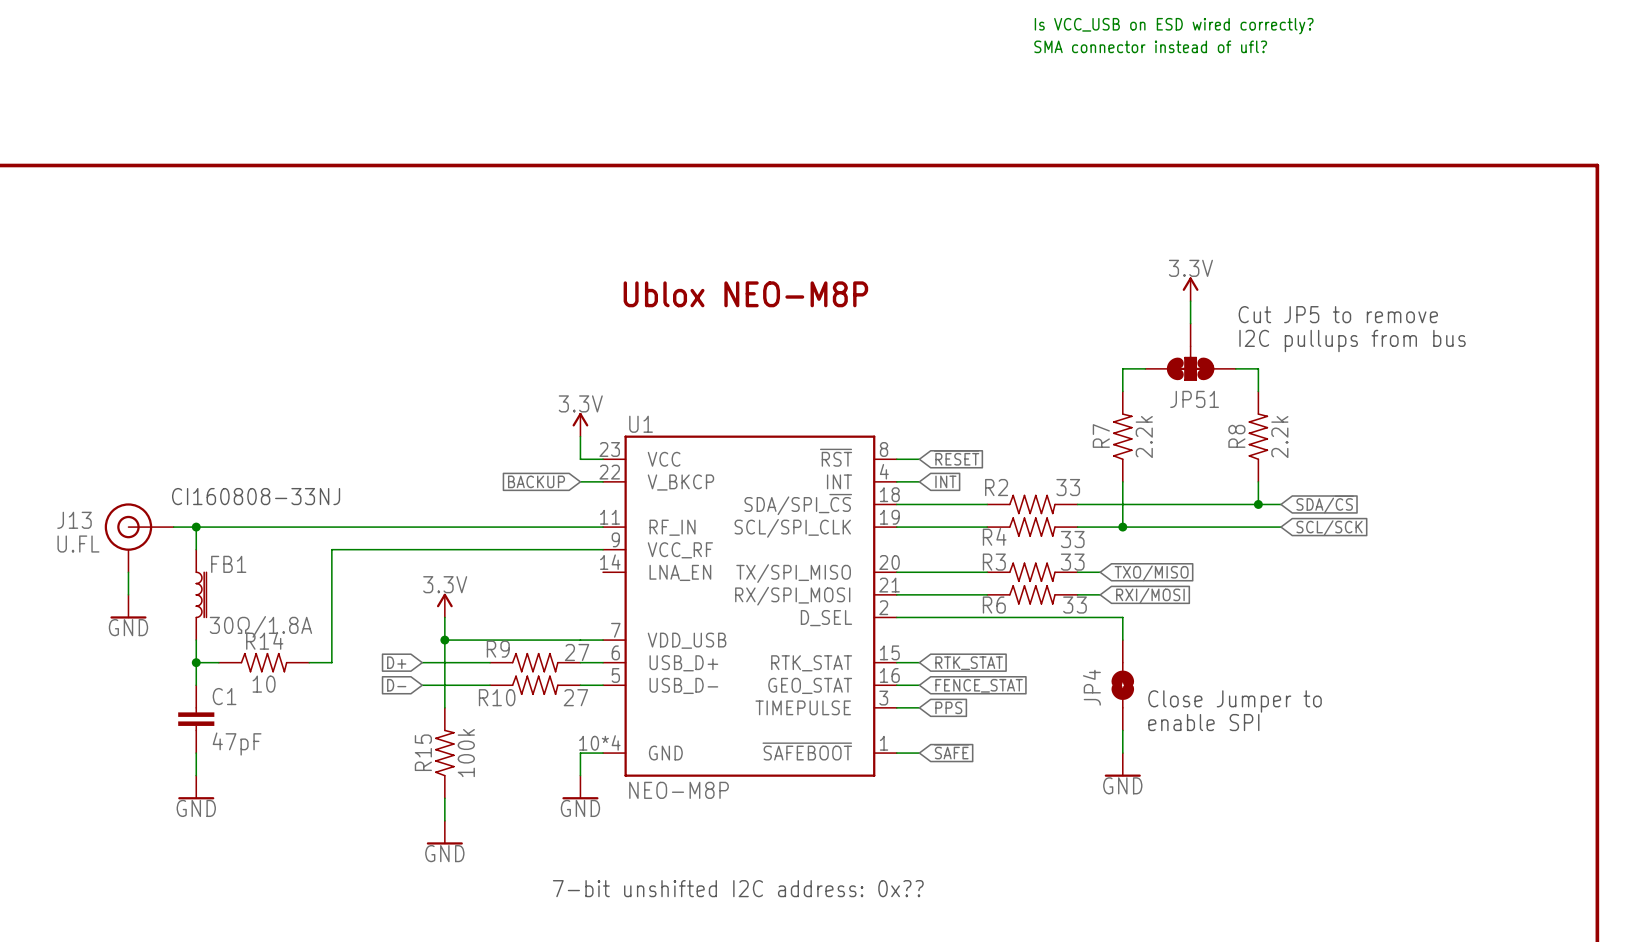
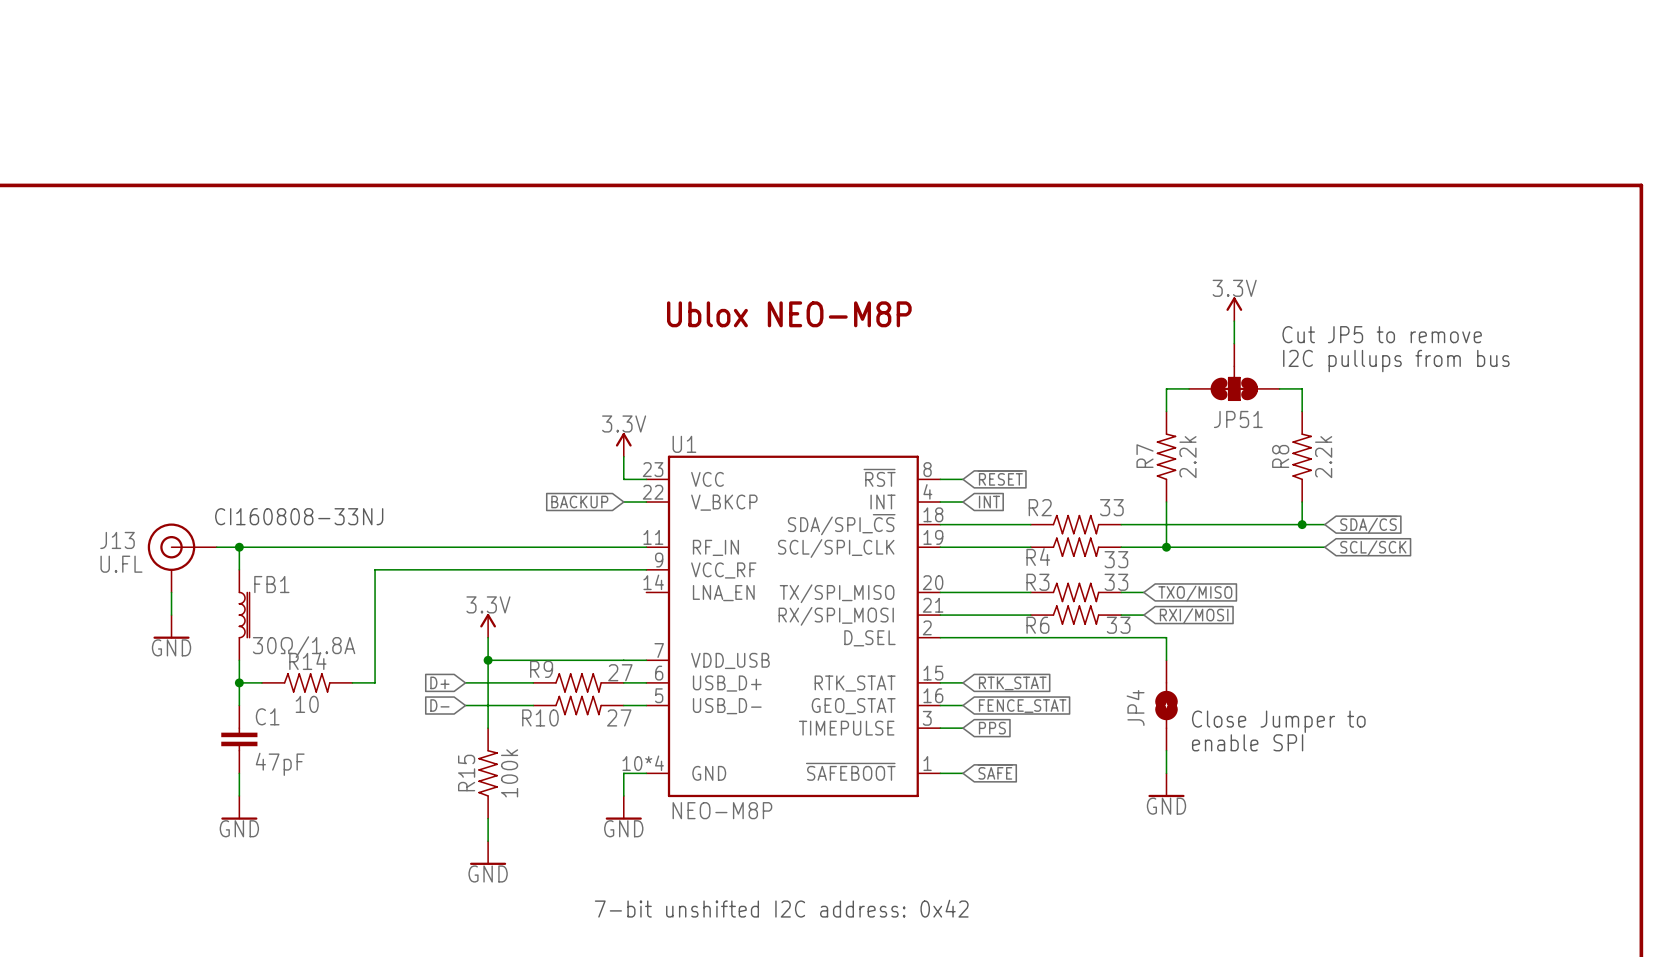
text: Is VCC_USB on ESD wired correctly? (1174, 26) -> none
text: SMA connector instead of ufl? (1150, 46) -> none
text: 7-bit unshifted I2C address: 0x?? (738, 888) -> 7-bit unshifted I2C address: 0x42 (781, 908)

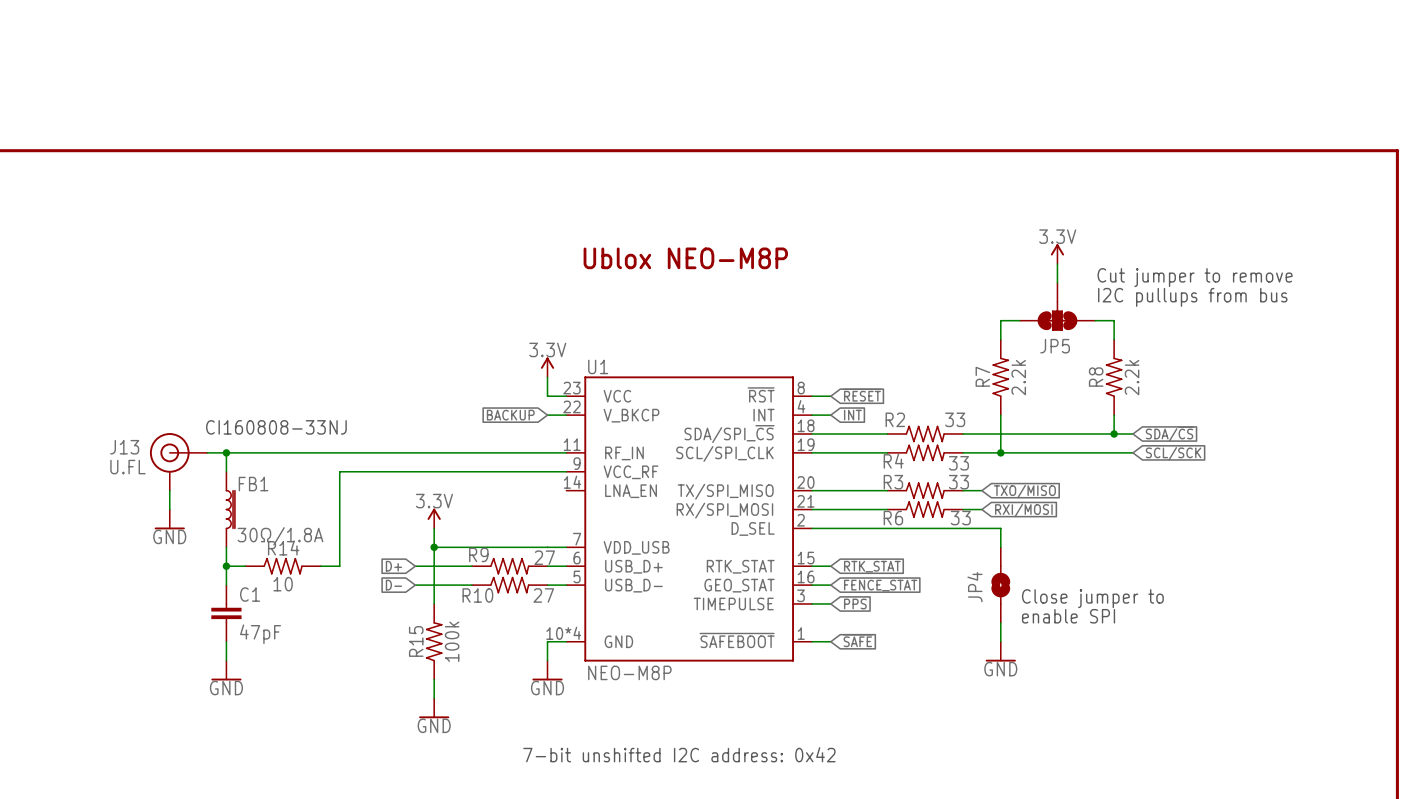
text: Cut JP5 to remove (1382, 334) -> Cut jumper to remove (1195, 277)
JP51 name: JP51 (1238, 419) -> JP5 (1055, 346)
text: Close Jumper to (1278, 721) -> Close jumper to (1092, 598)

